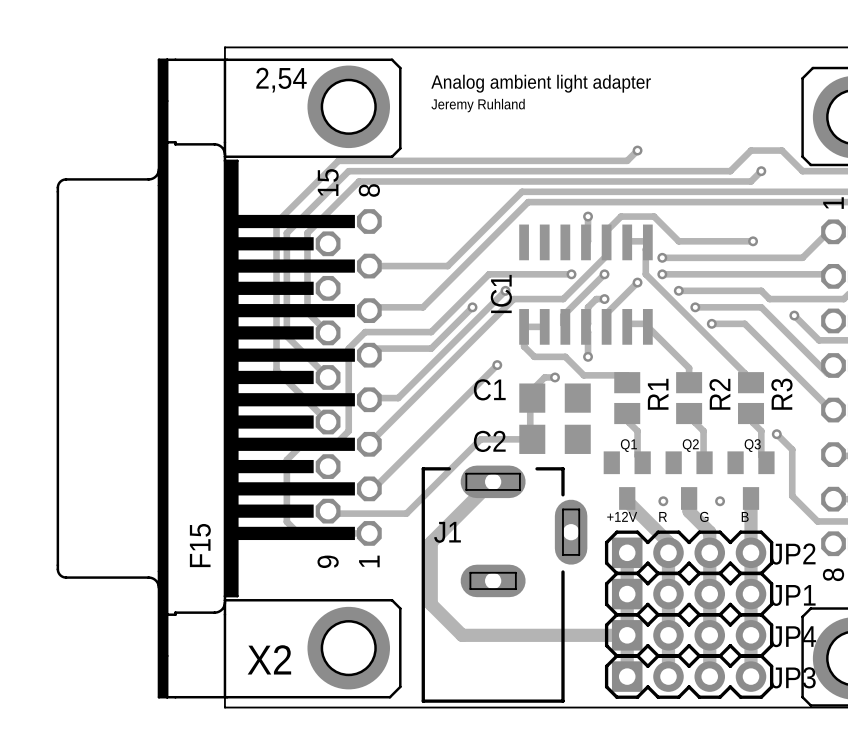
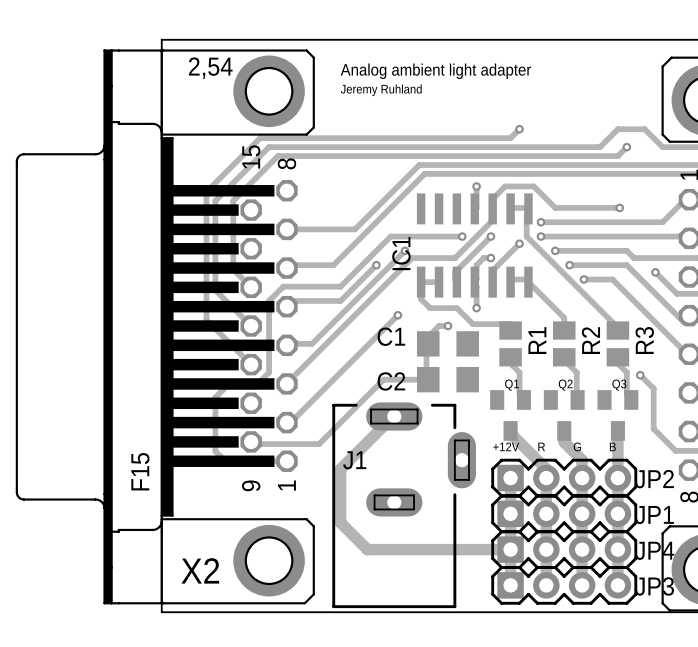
via: (663, 501) -> none
via: (720, 501) -> none

